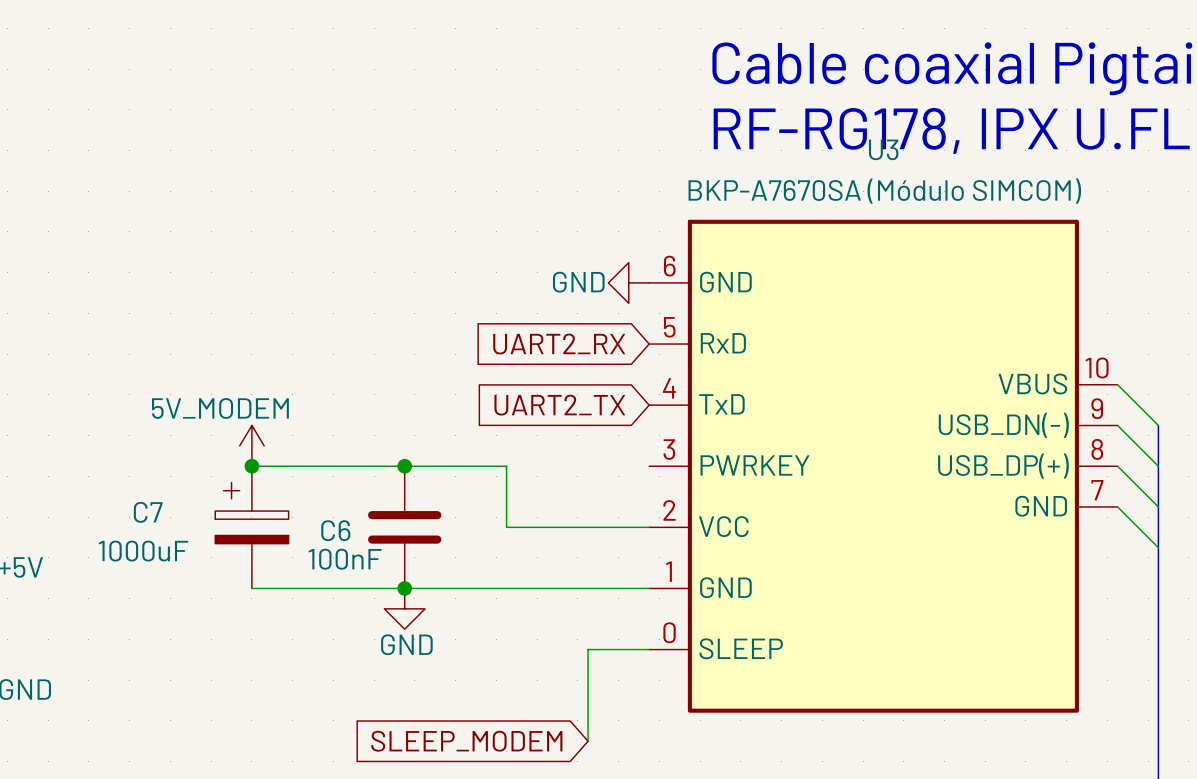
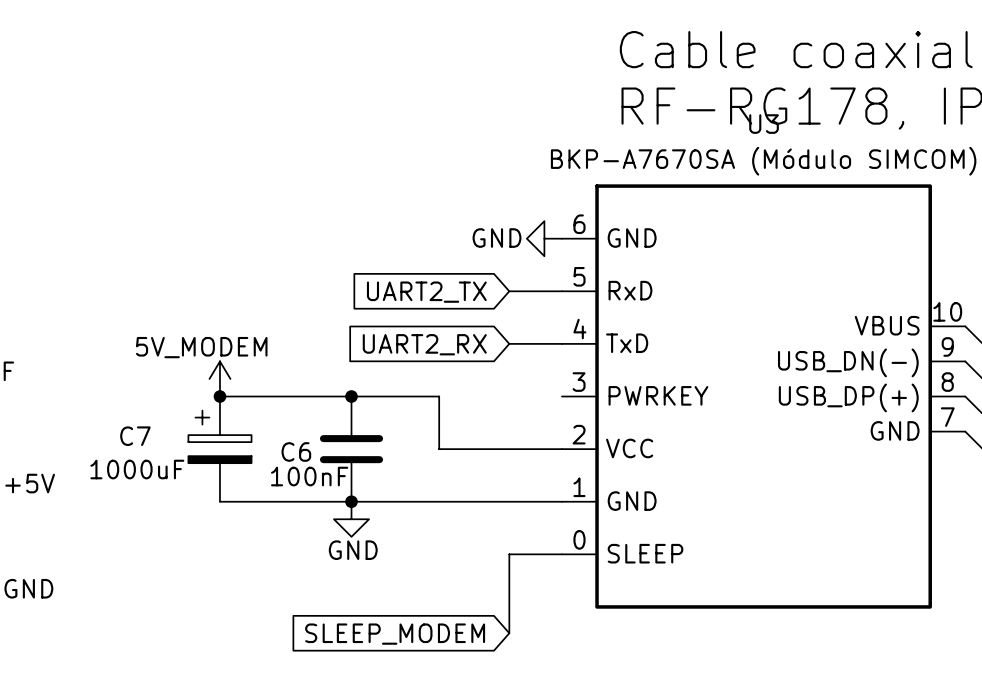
global label position: UART2_RX (559, 344) -> UART2_RX (424, 344)
wire: none -> (509, 291) (561, 291)
global label position: UART2_TX (559, 405) -> UART2_TX (426, 292)
wire: none -> (509, 343) (561, 343)

